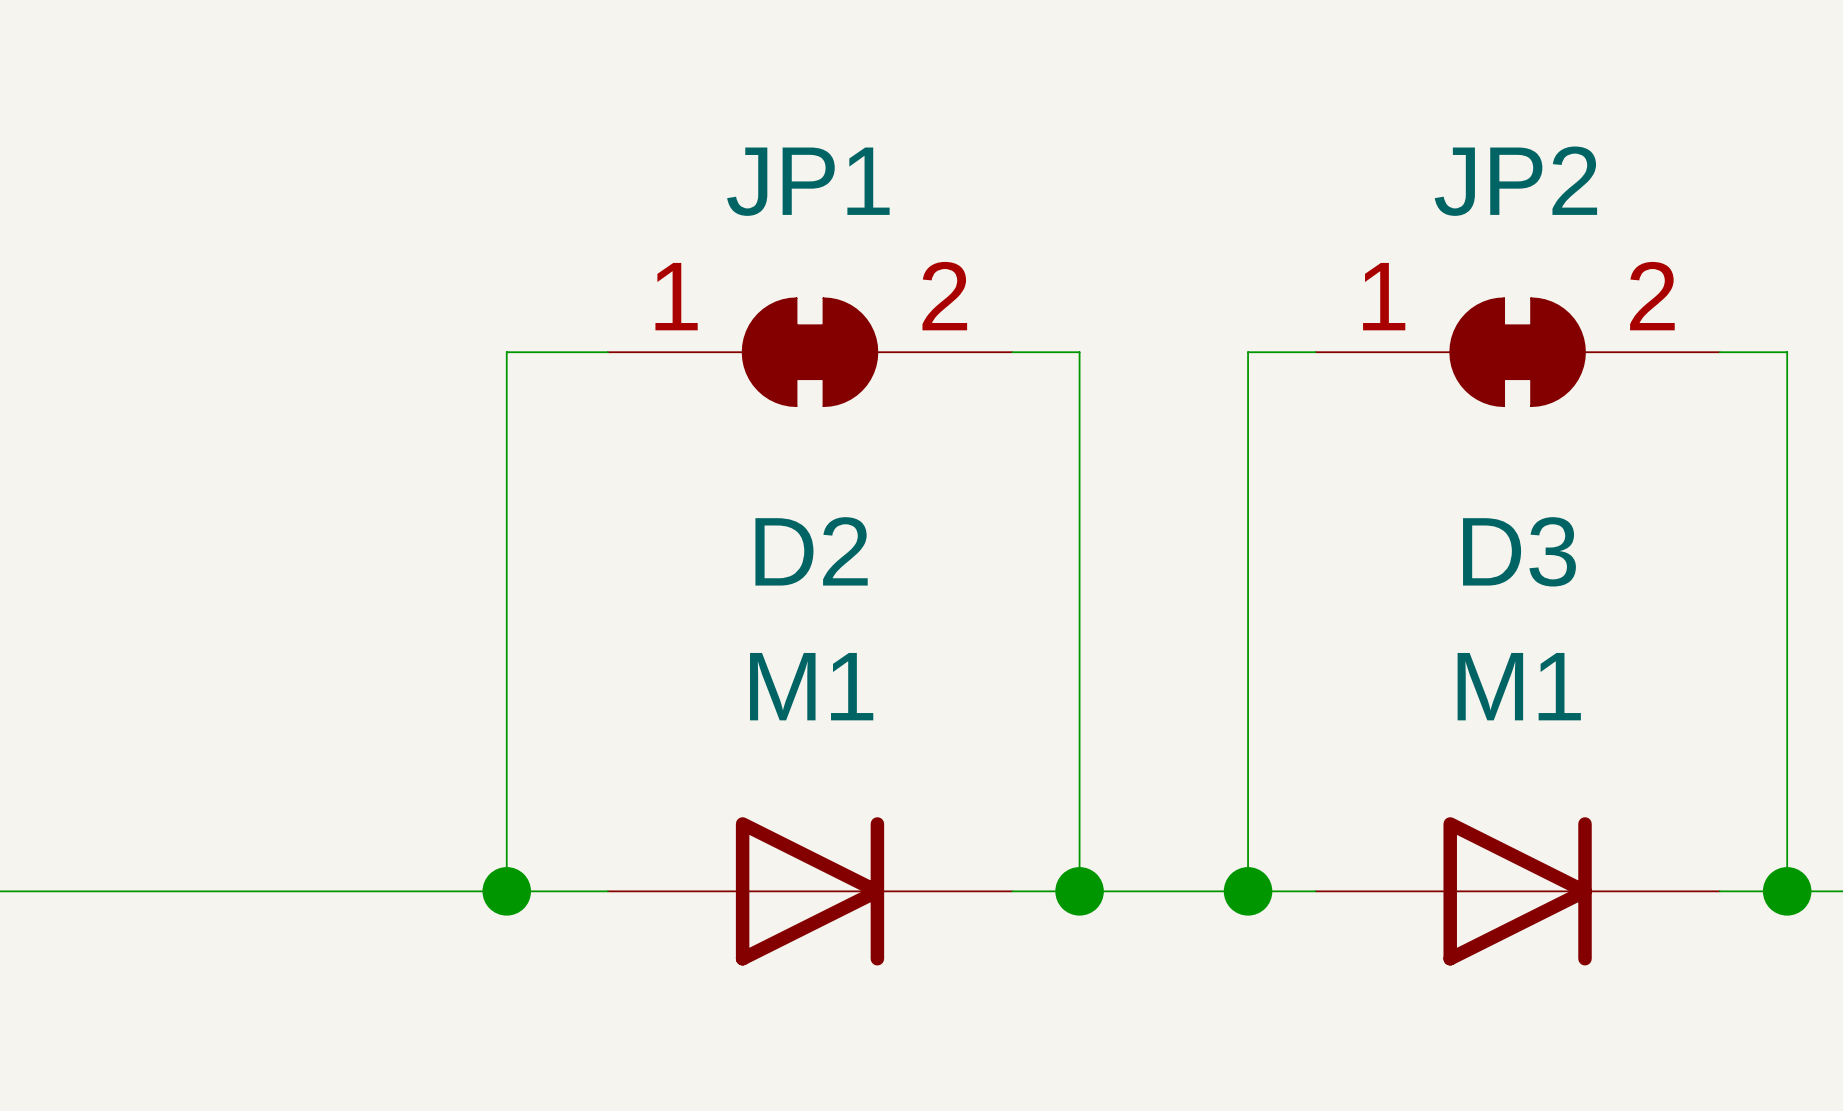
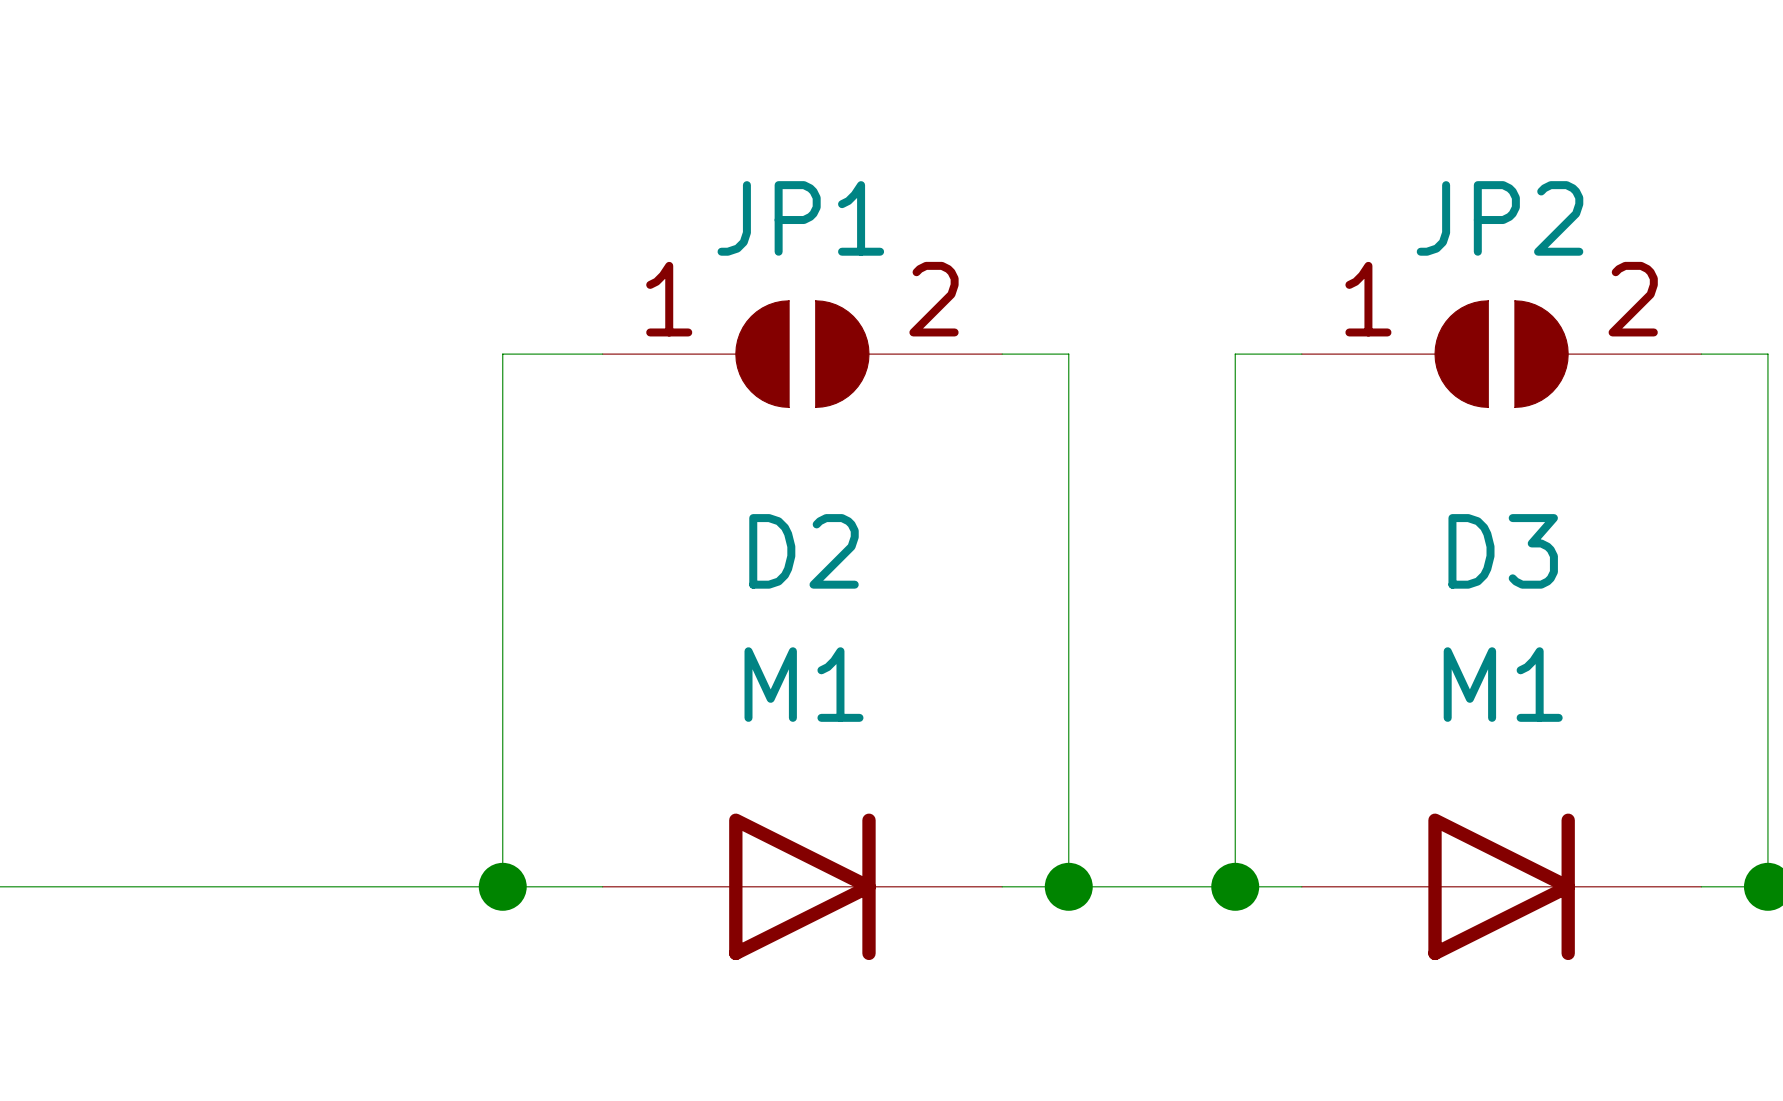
JP1 name position: JP1 (808, 181) -> JP1 (800, 218)
JP2 name position: JP2 (1515, 181) -> JP2 (1500, 218)
JP1 symbol: [607, 298, 1013, 407] -> [602, 300, 1003, 408]
JP2 symbol: [1315, 298, 1720, 407] -> [1301, 300, 1702, 408]

